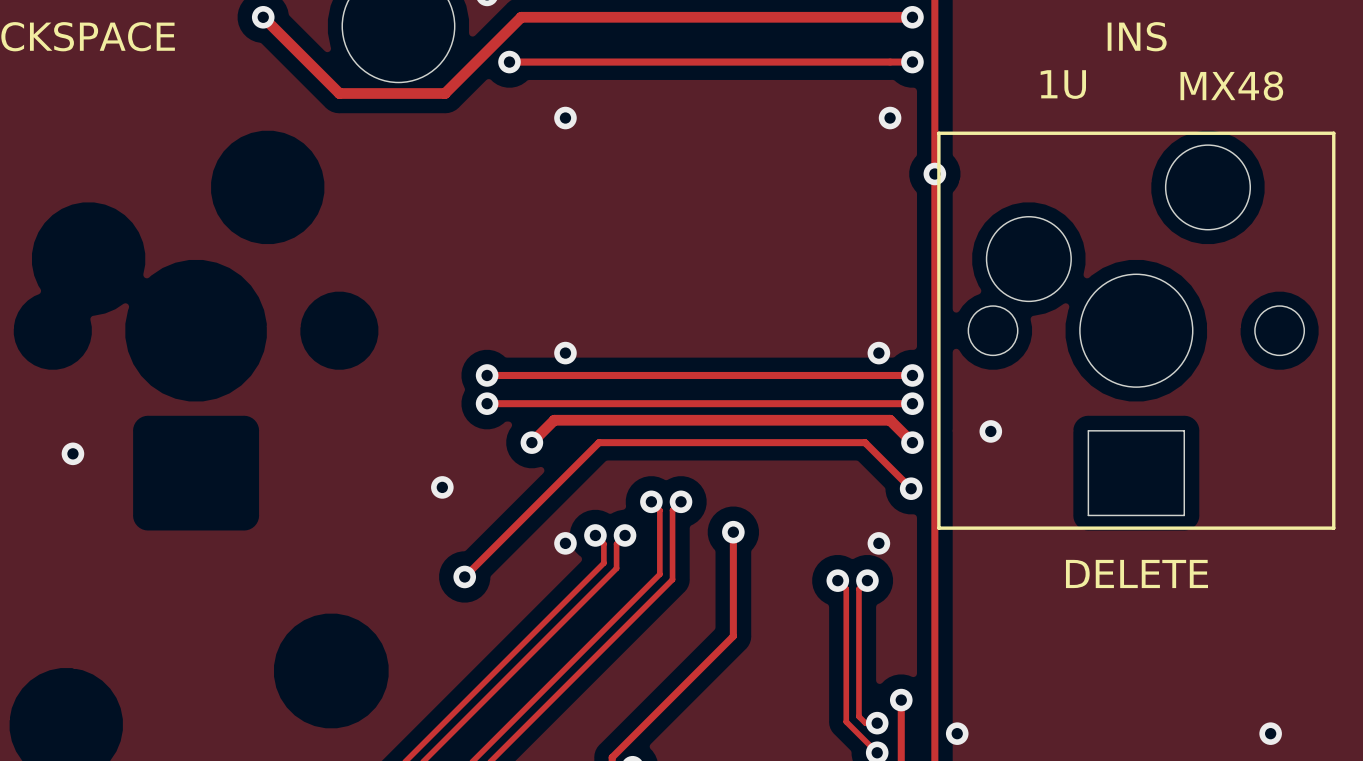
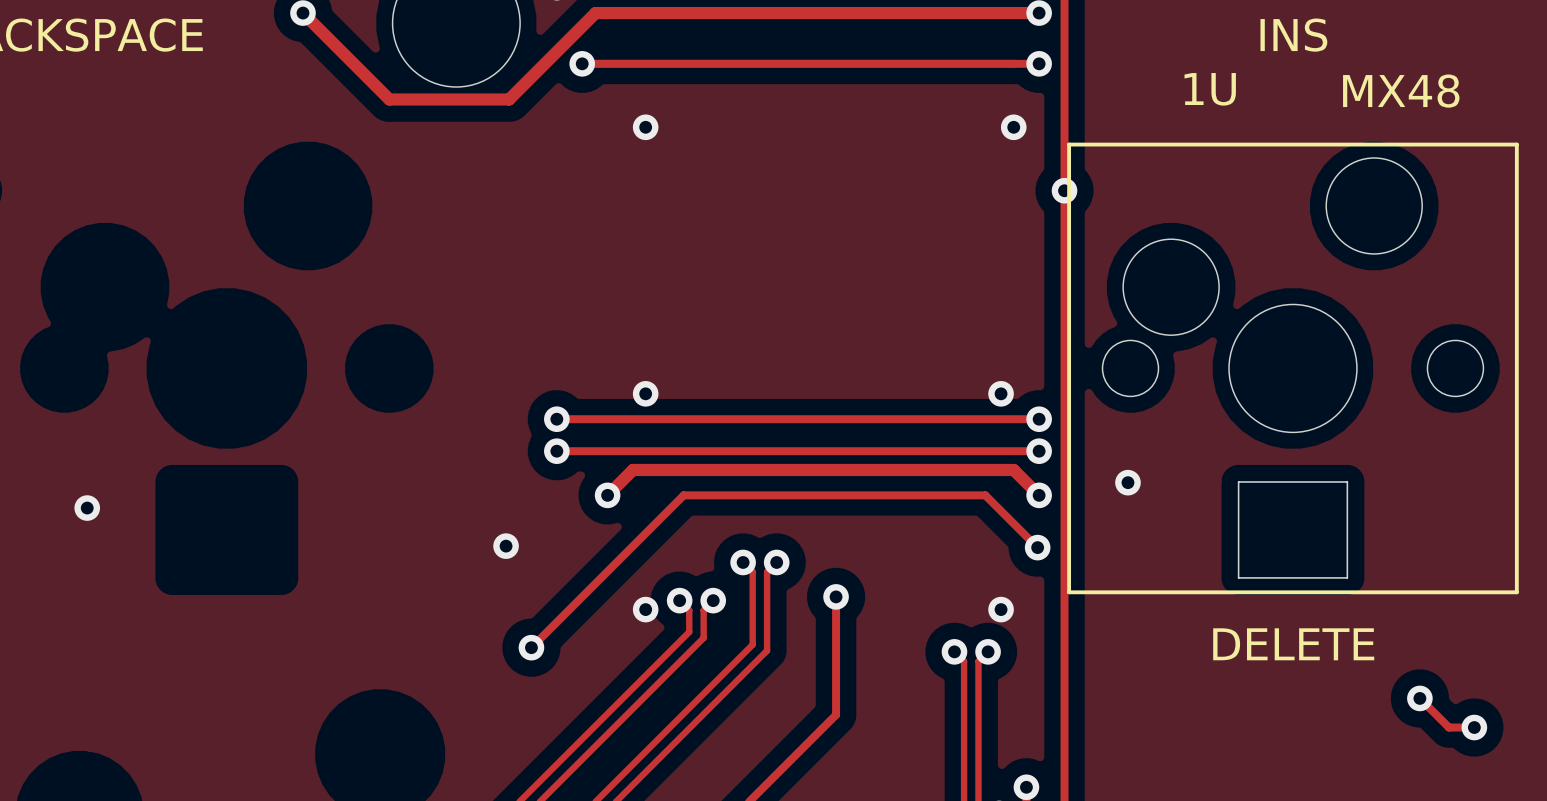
track: none -> (1419, 698) (1448, 727) (1474, 727)
via: none -> (1419, 698)
via: none -> (1474, 727)

